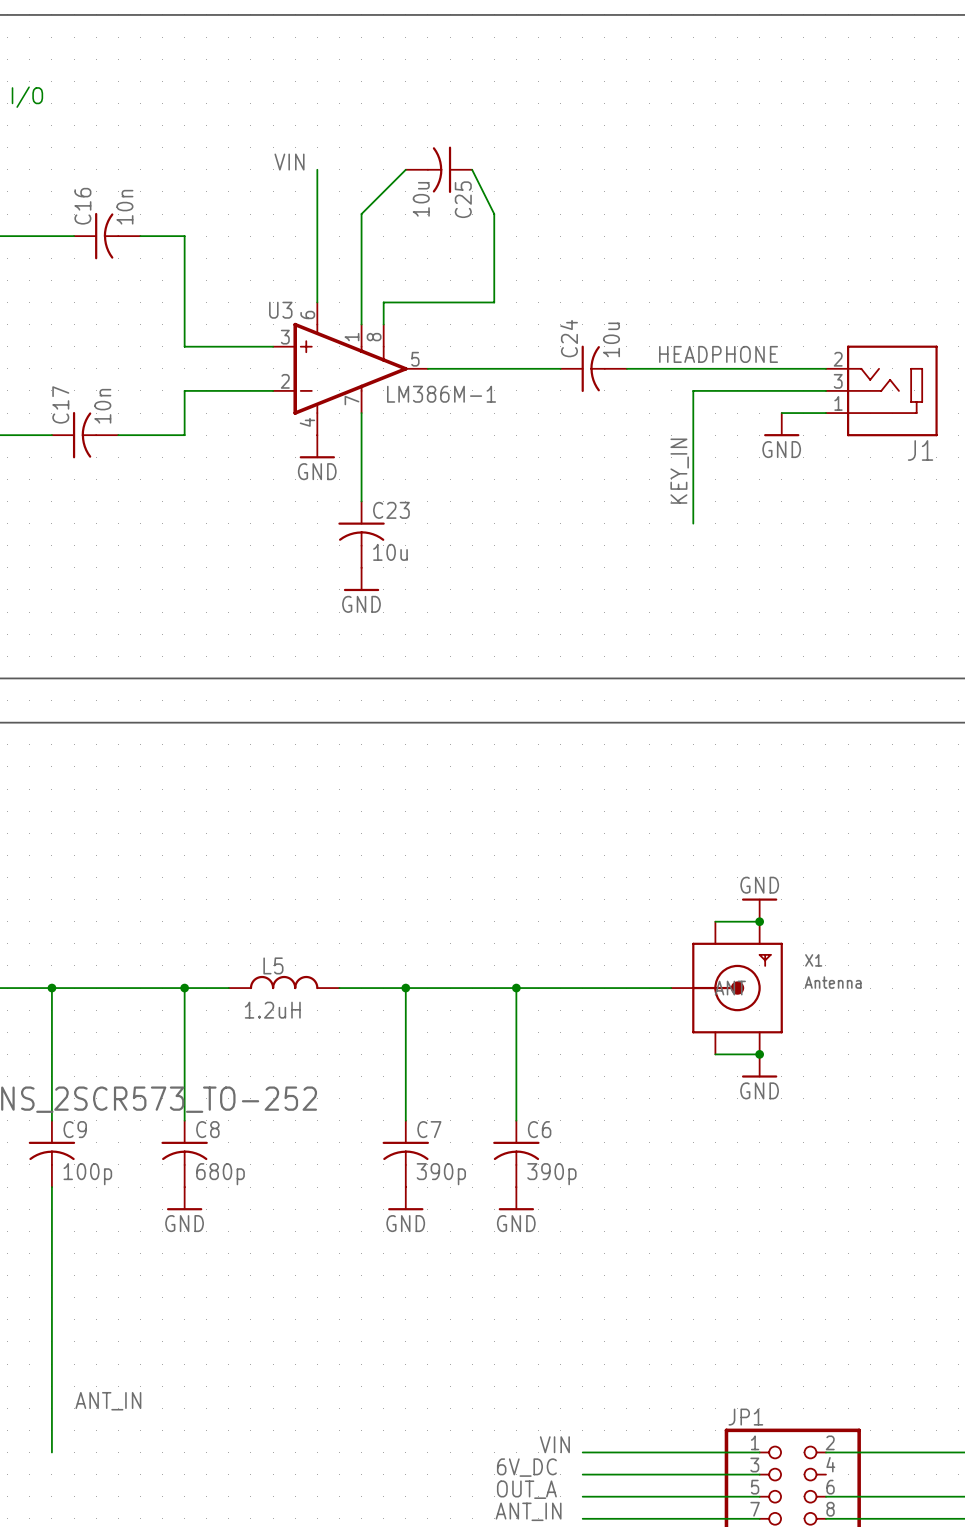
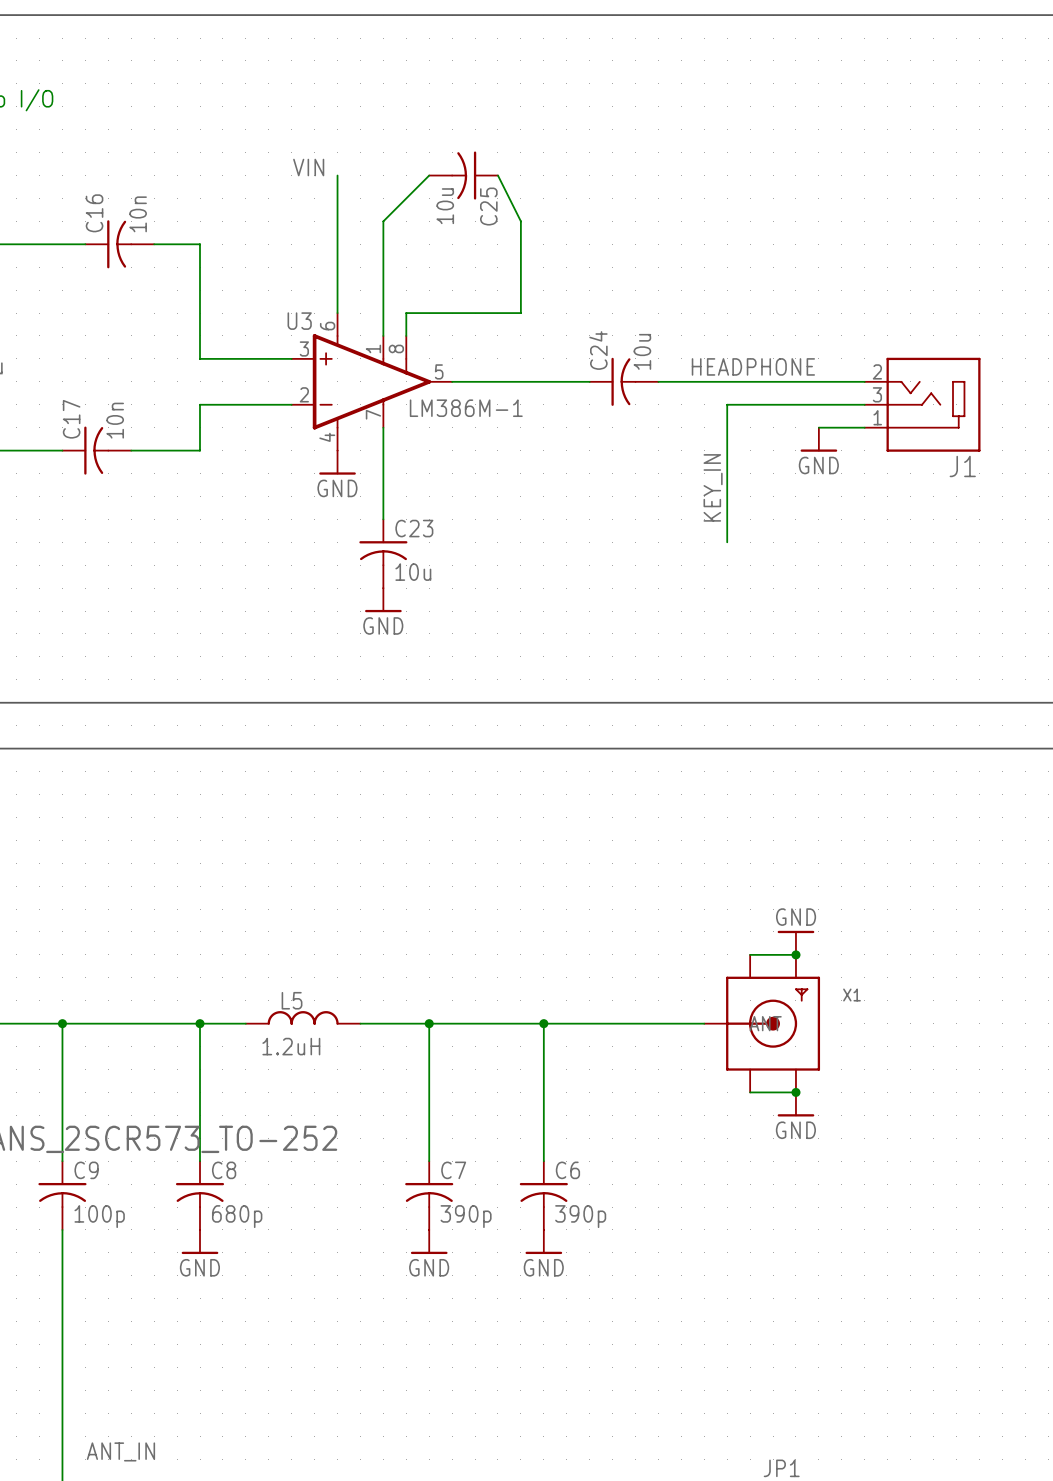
X1 value: Antenna (833, 982) -> none

